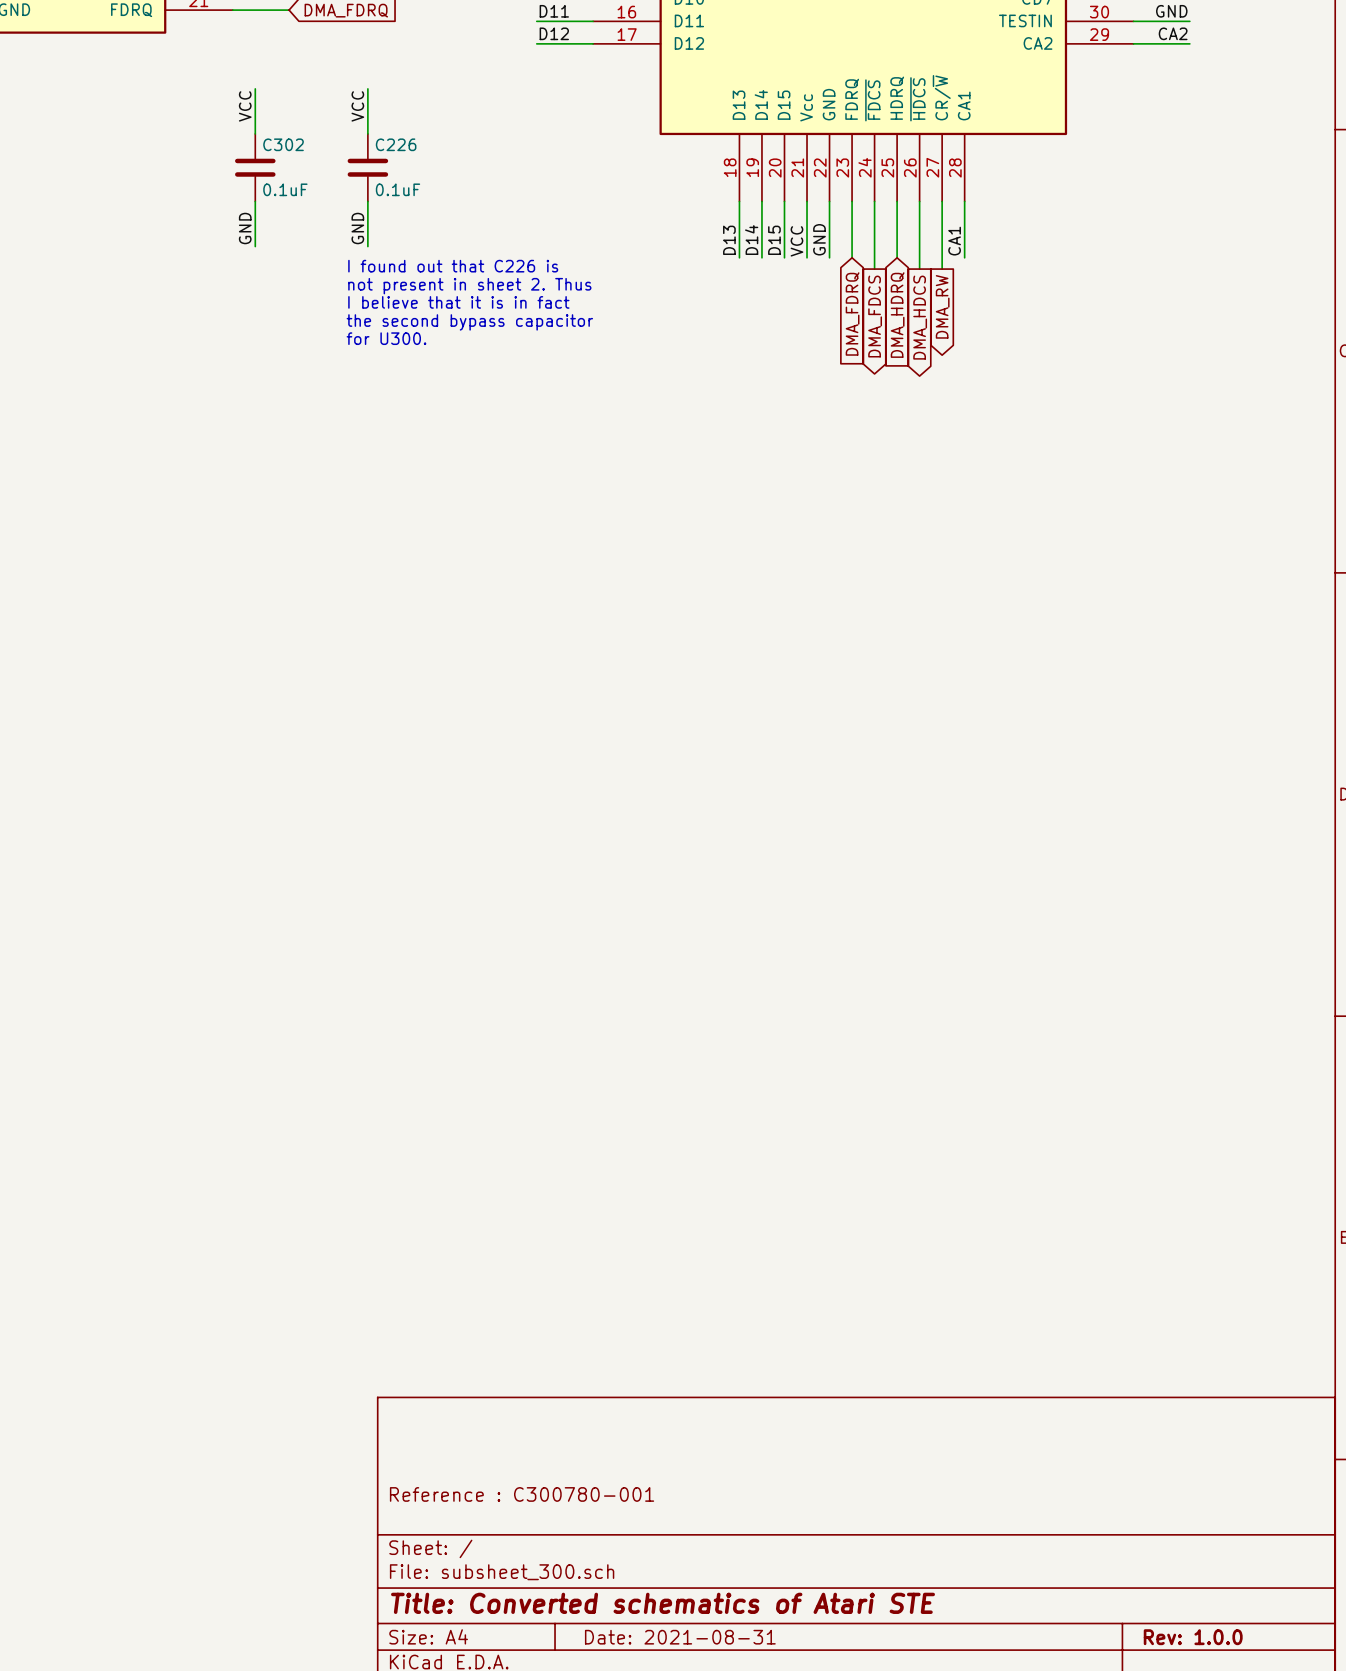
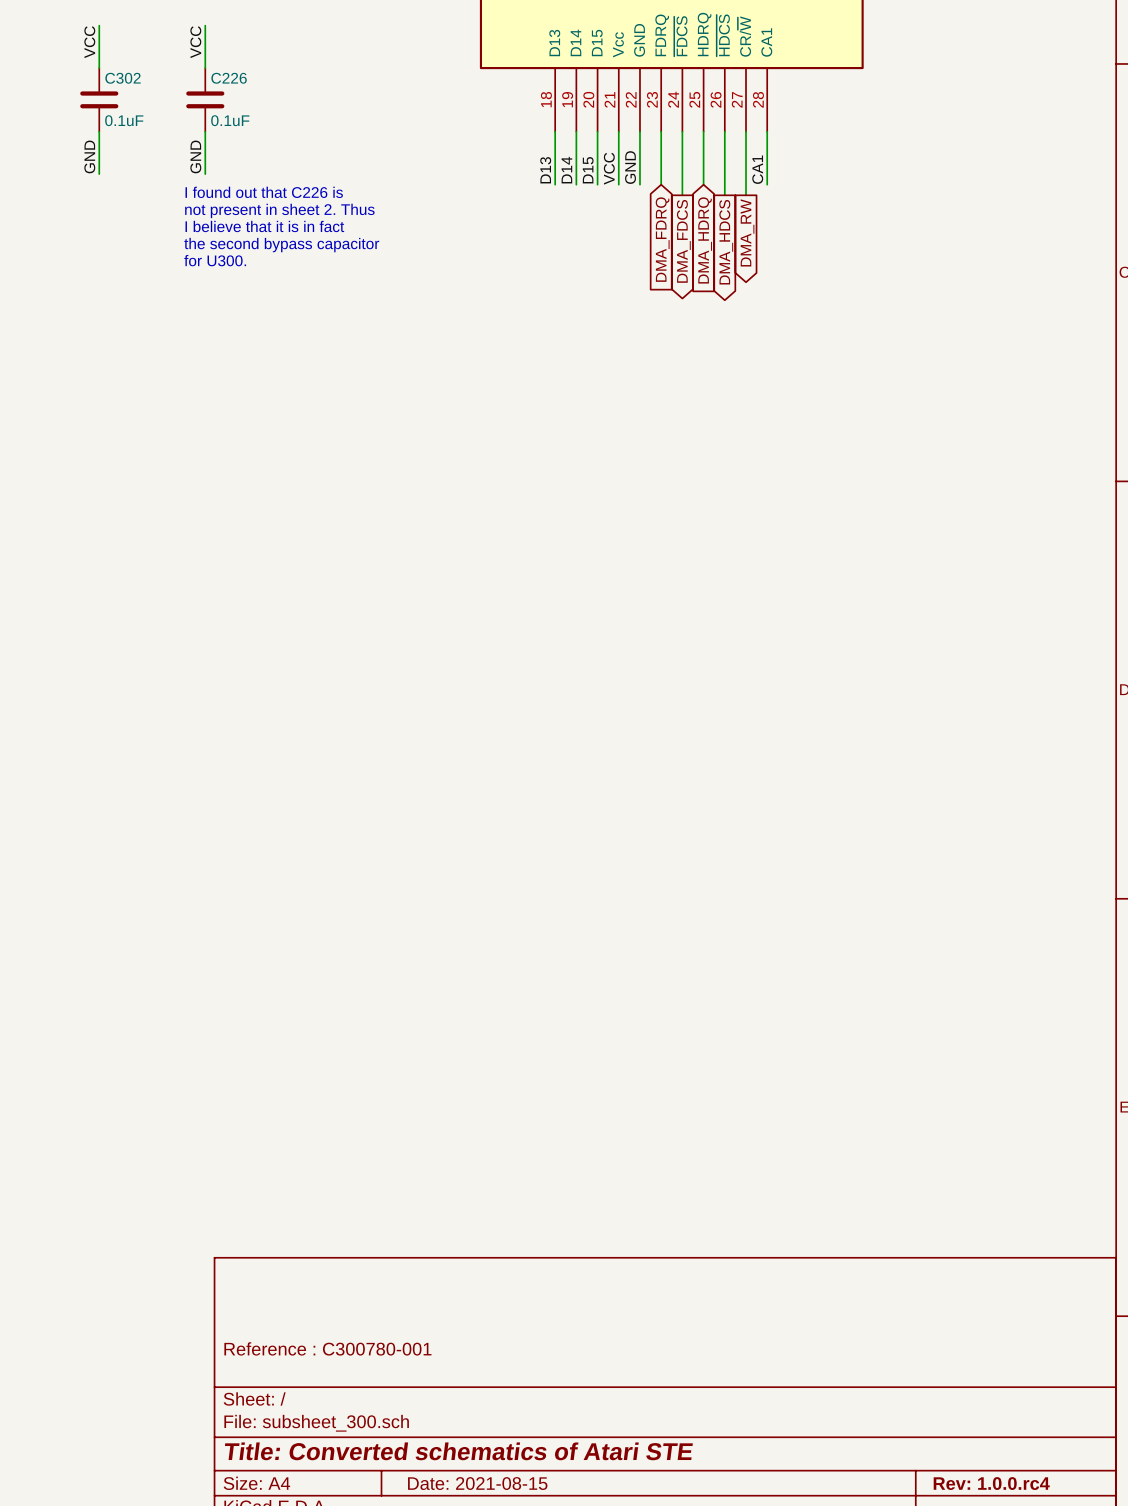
title block: Date: 2021-08-31 (680, 1637) -> Date: 2021-08-15 (477, 1483)
title block: Rev: 1.0.0 (1193, 1637) -> Rev: 1.0.0.rc4 (991, 1483)

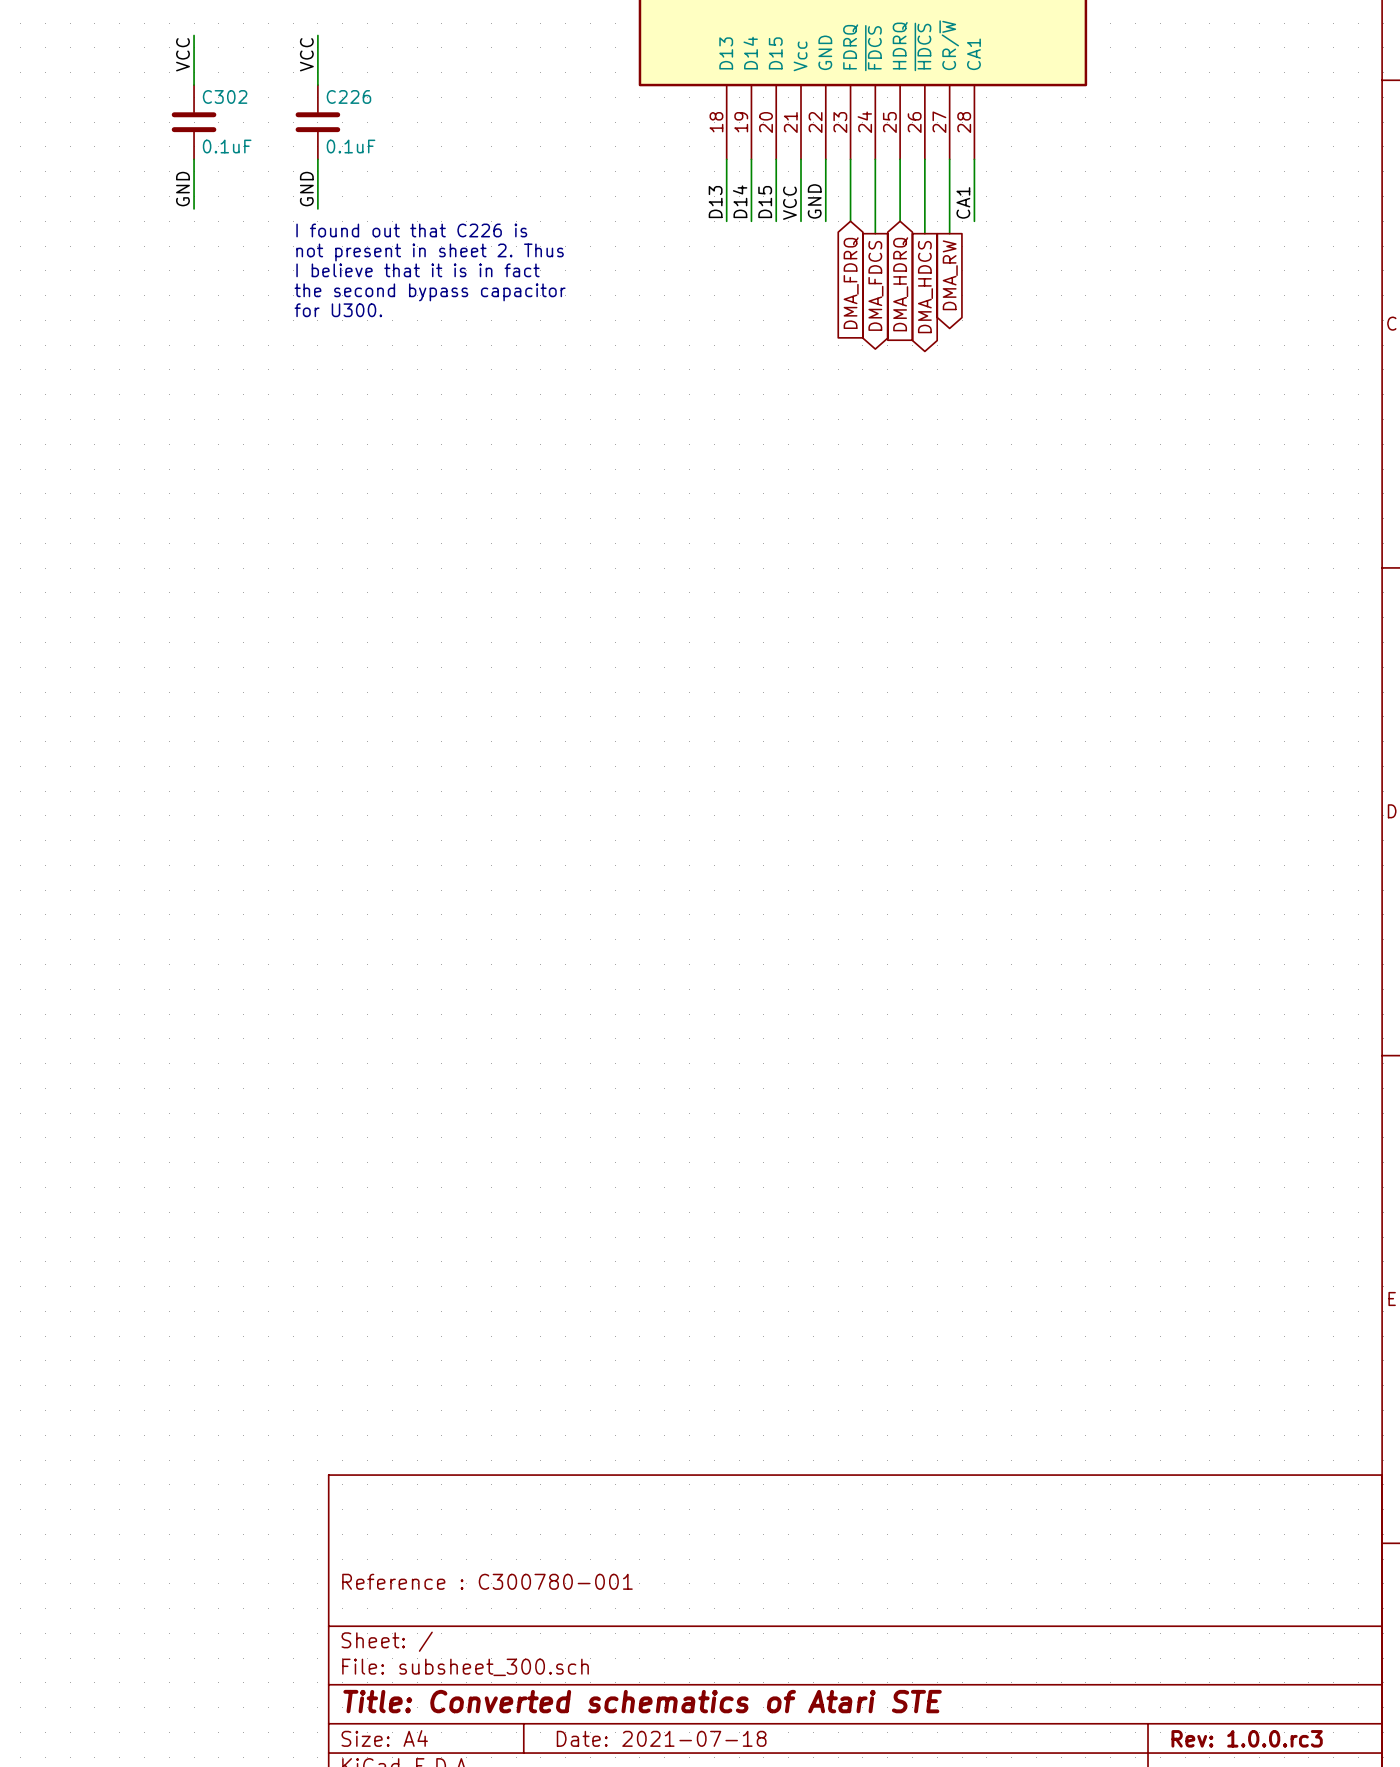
title block: Date: 2021-08-15 (477, 1483) -> Date: 2021-07-18 (661, 1738)
title block: Rev: 1.0.0.rc4 (991, 1483) -> Rev: 1.0.0.rc3 (1247, 1738)

